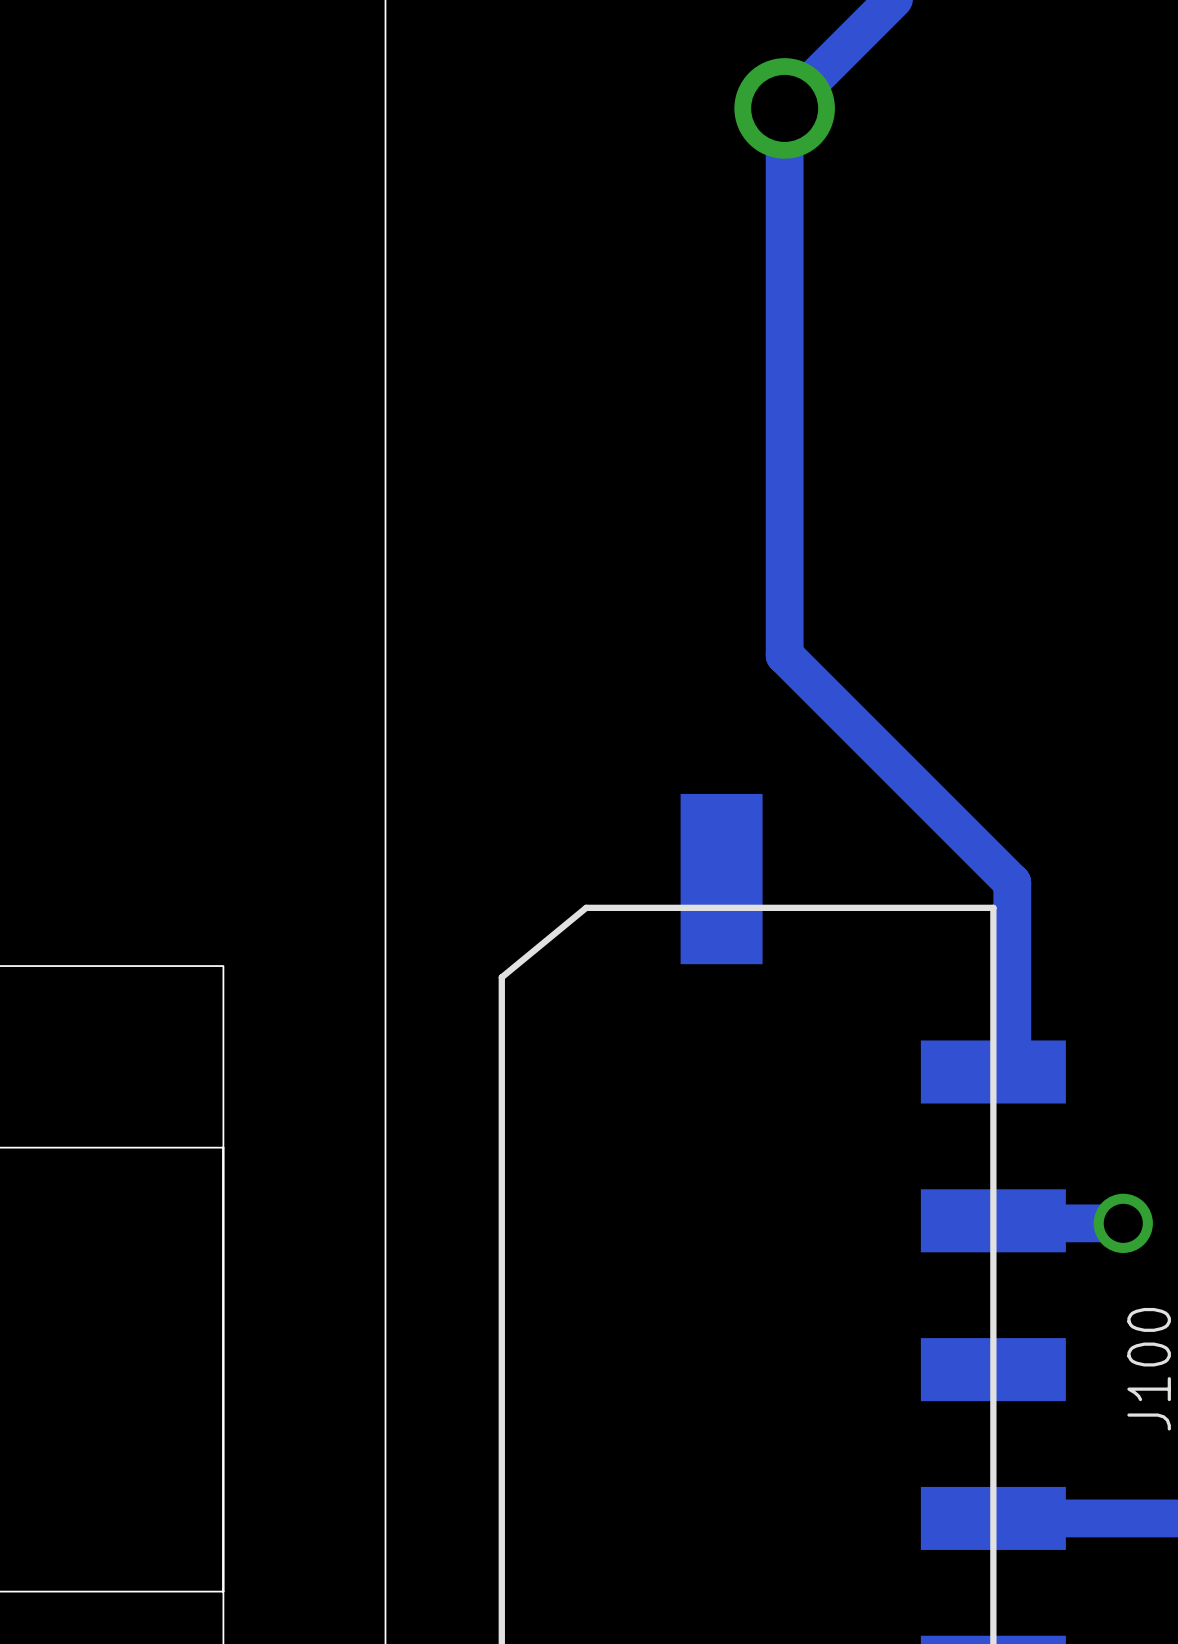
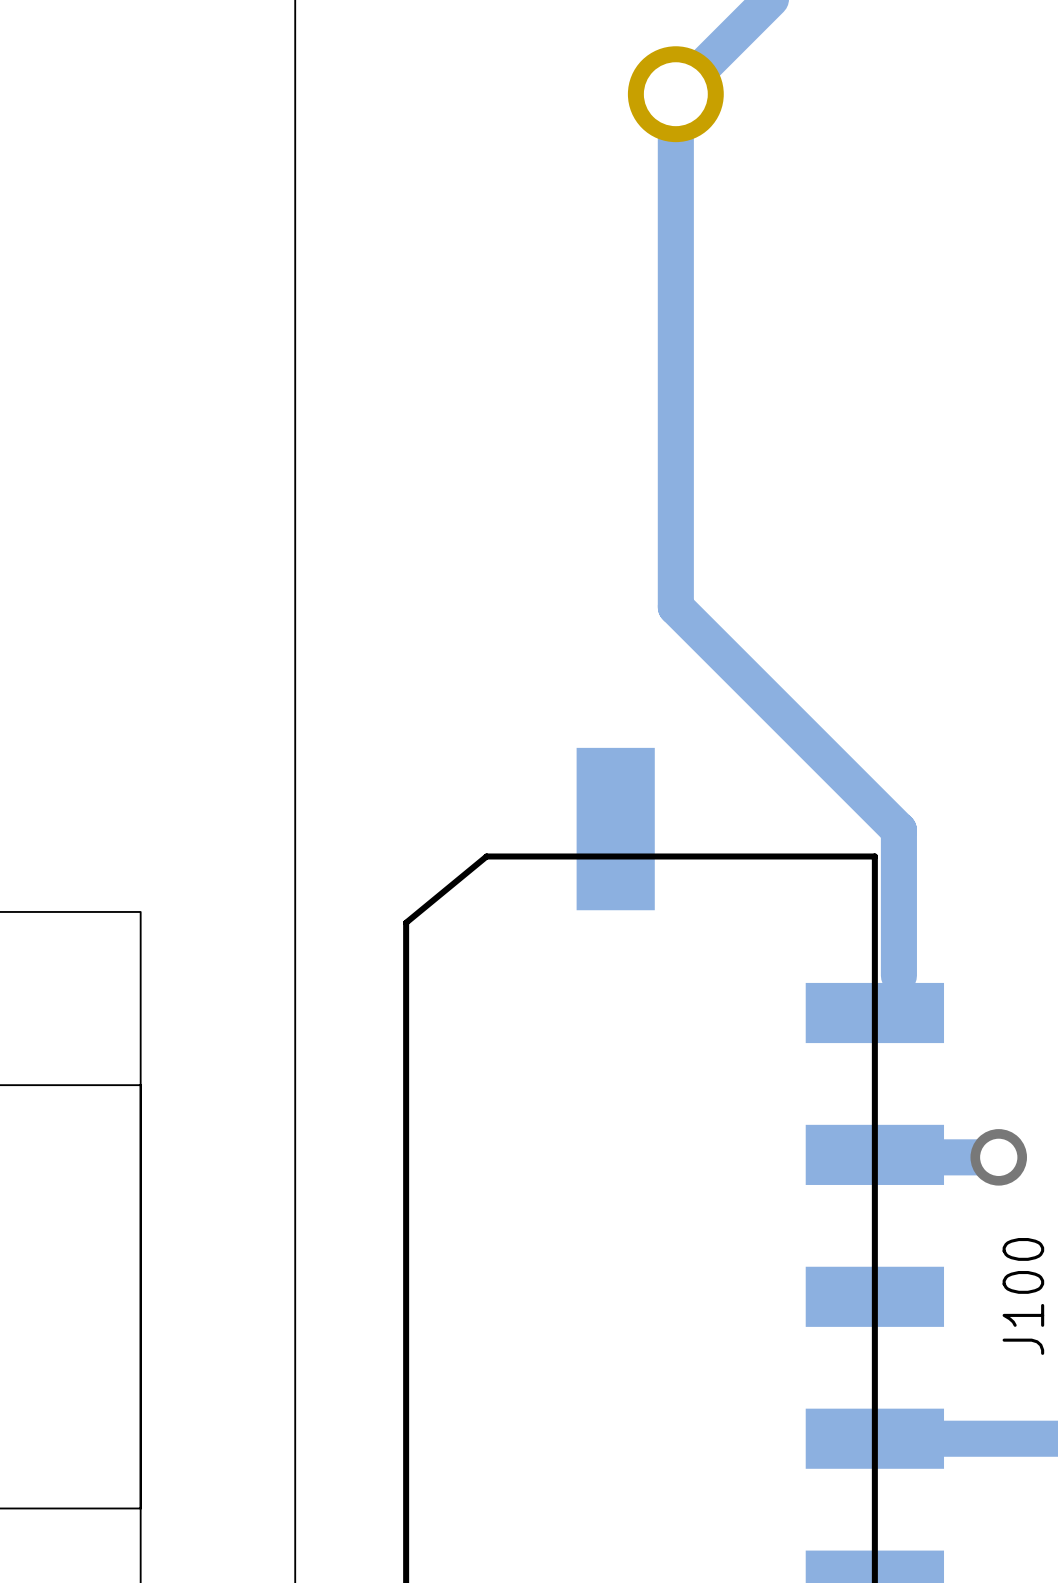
track: (784, 646) (784, 655) (1012, 882) (1012, 1053) (995, 1069) -> (675, 607) (898, 830) (898, 975)

